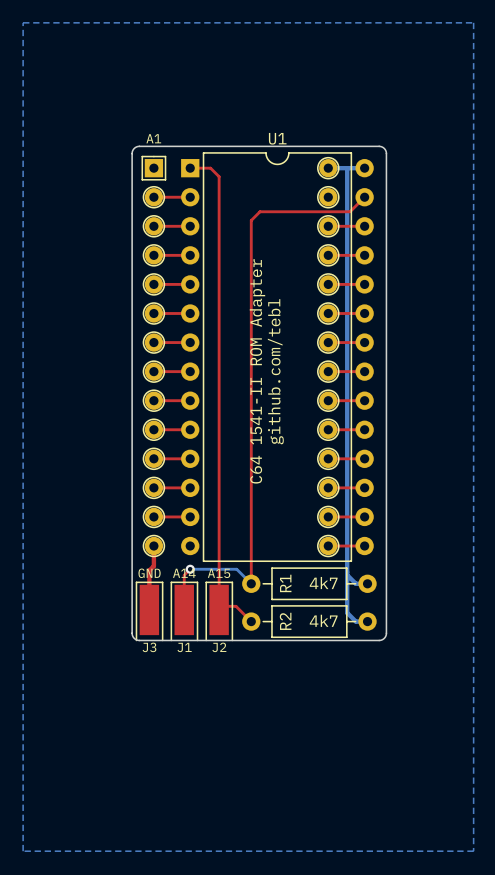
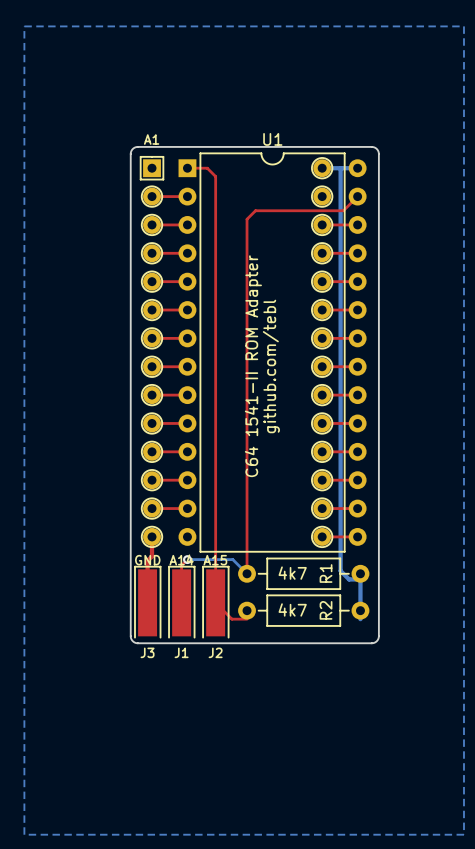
bottom track: (347, 575) (355, 583) (367, 583) -> none
bottom track: (347, 580) (347, 612) (355, 621) (367, 621) -> (340, 570) (349, 579) (360, 579) (360, 619)
J3 footprint: [135, 581, 164, 642] -> [134, 566, 162, 639]
J1 footprint: [170, 581, 199, 642] -> [168, 566, 196, 639]
J2 footprint: [205, 581, 234, 642] -> [202, 566, 230, 639]
R1 name position: R1 (285, 583) -> R1 (326, 573)
R1 value position: 4k7 (323, 583) -> 4k7 (292, 573)
top track: (219, 606) (236, 606) (251, 621) -> (215, 595) (215, 602) (231, 619) (247, 619)
R2 value position: 4k7 (323, 620) -> 4k7 (292, 609)
R2 name position: R2 (285, 621) -> R2 (326, 610)
board edge: (132, 633) (134, 638) (139, 640) -> none
board edge: (386, 633) (384, 638) (379, 640) (139, 640) -> (378, 622) (378, 638) (371, 643) (136, 643) (130, 638) (130, 622)

